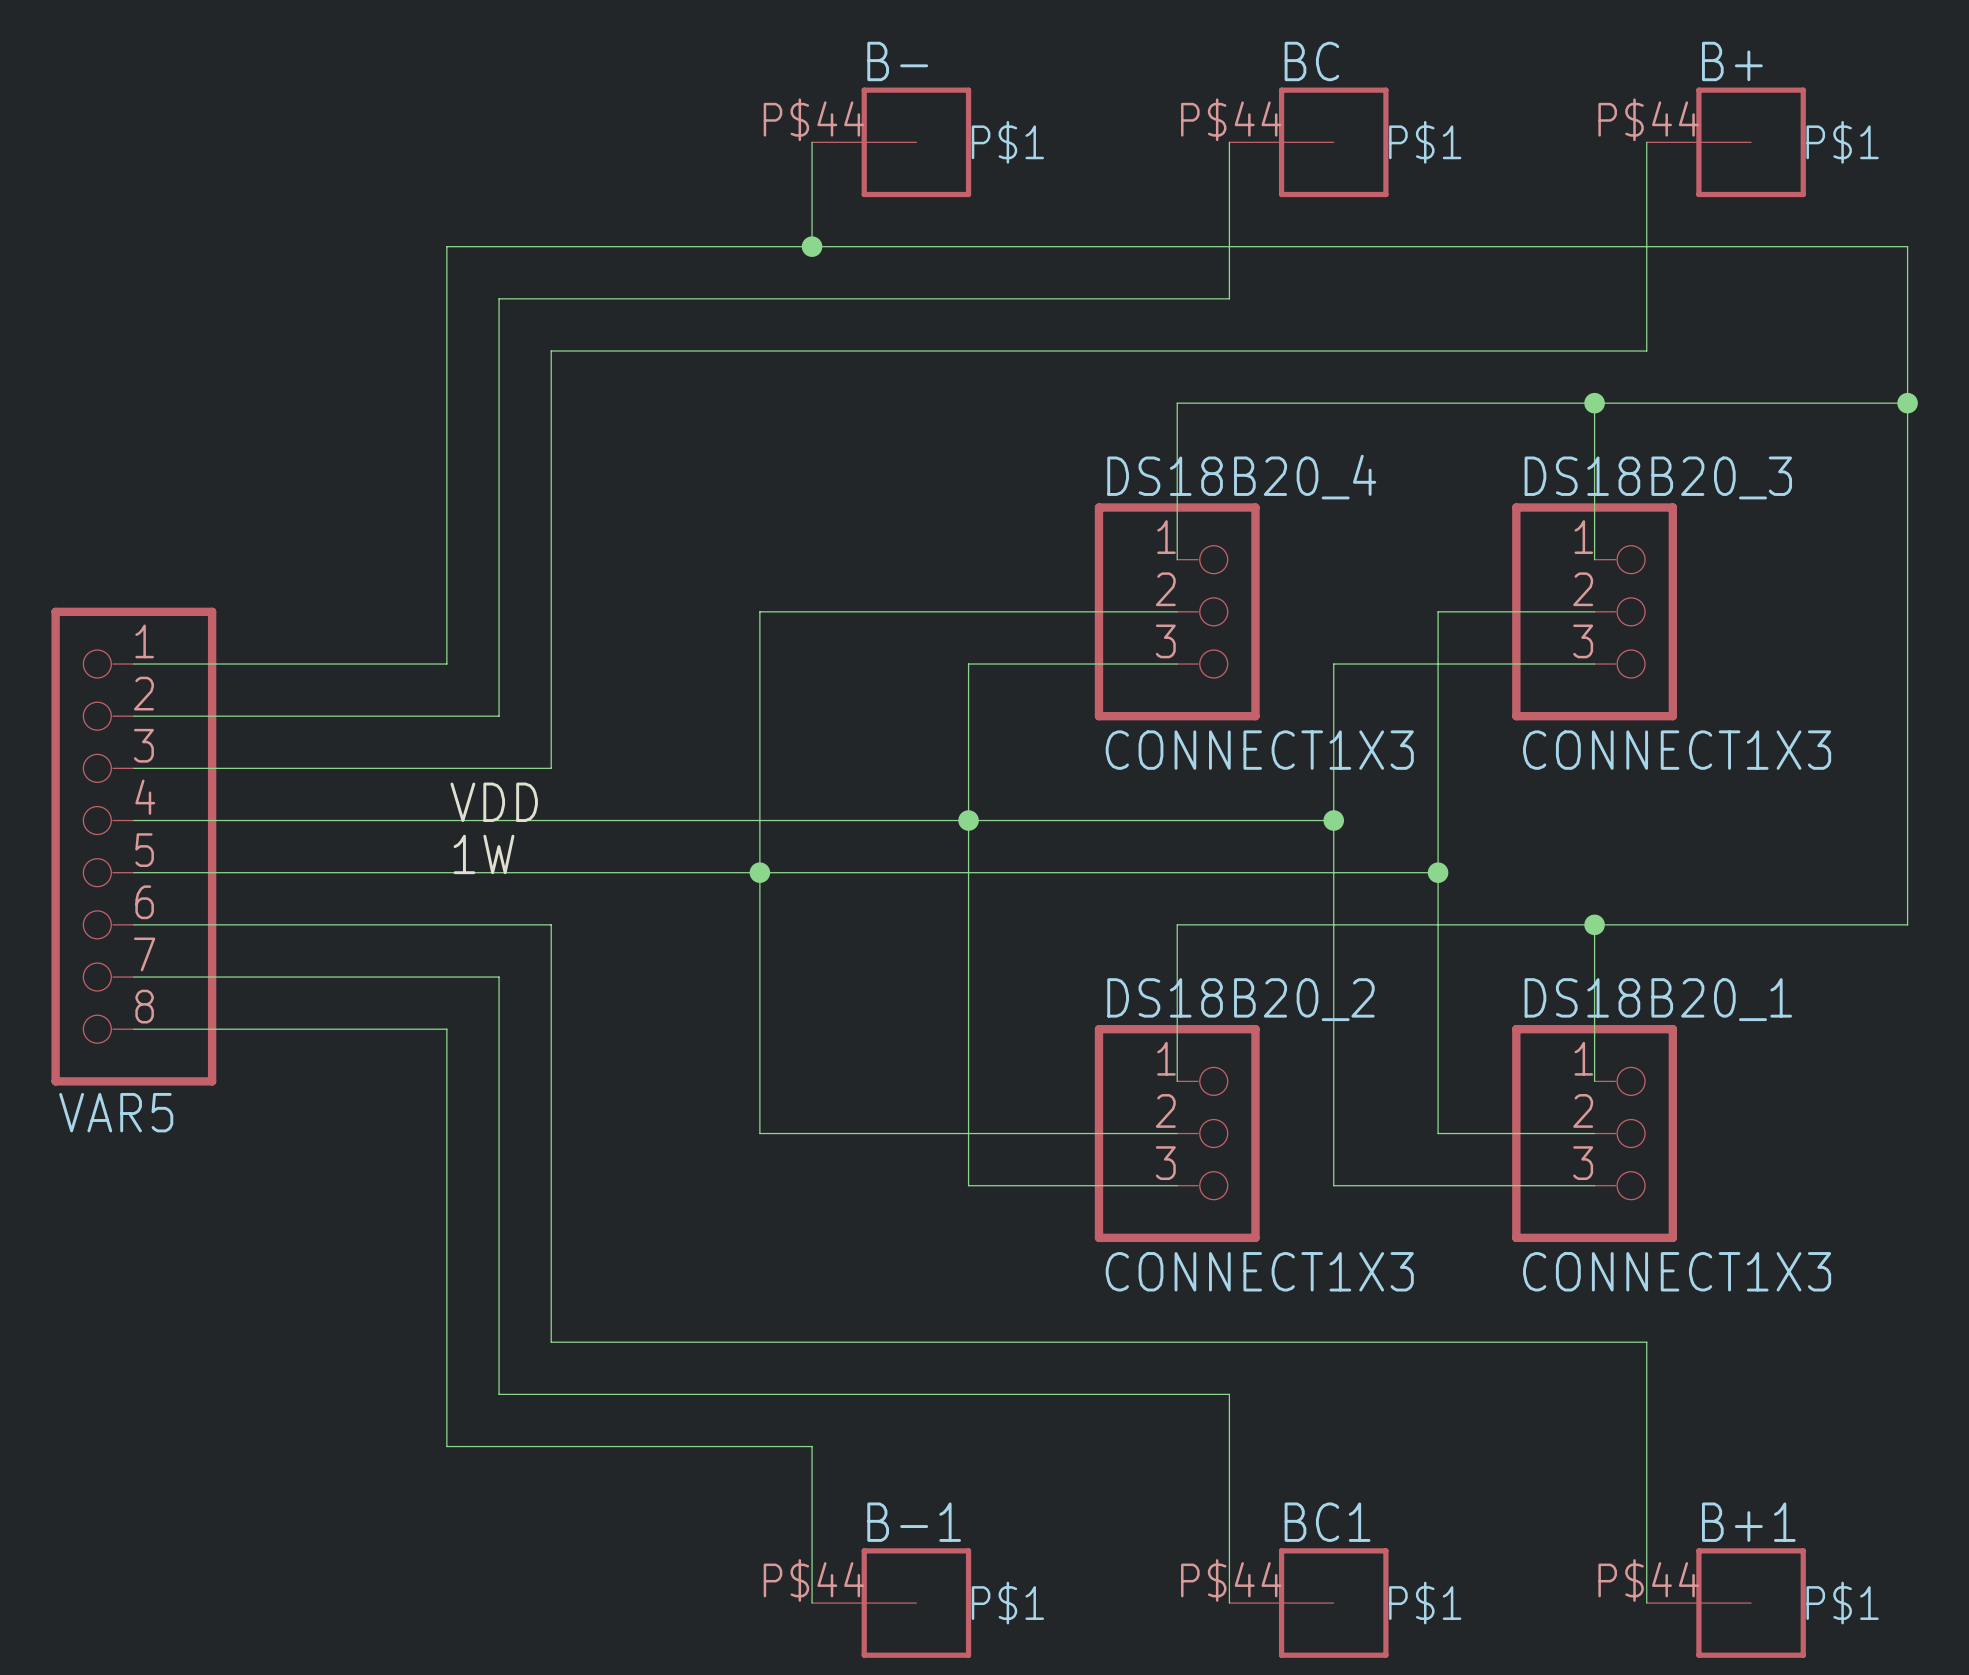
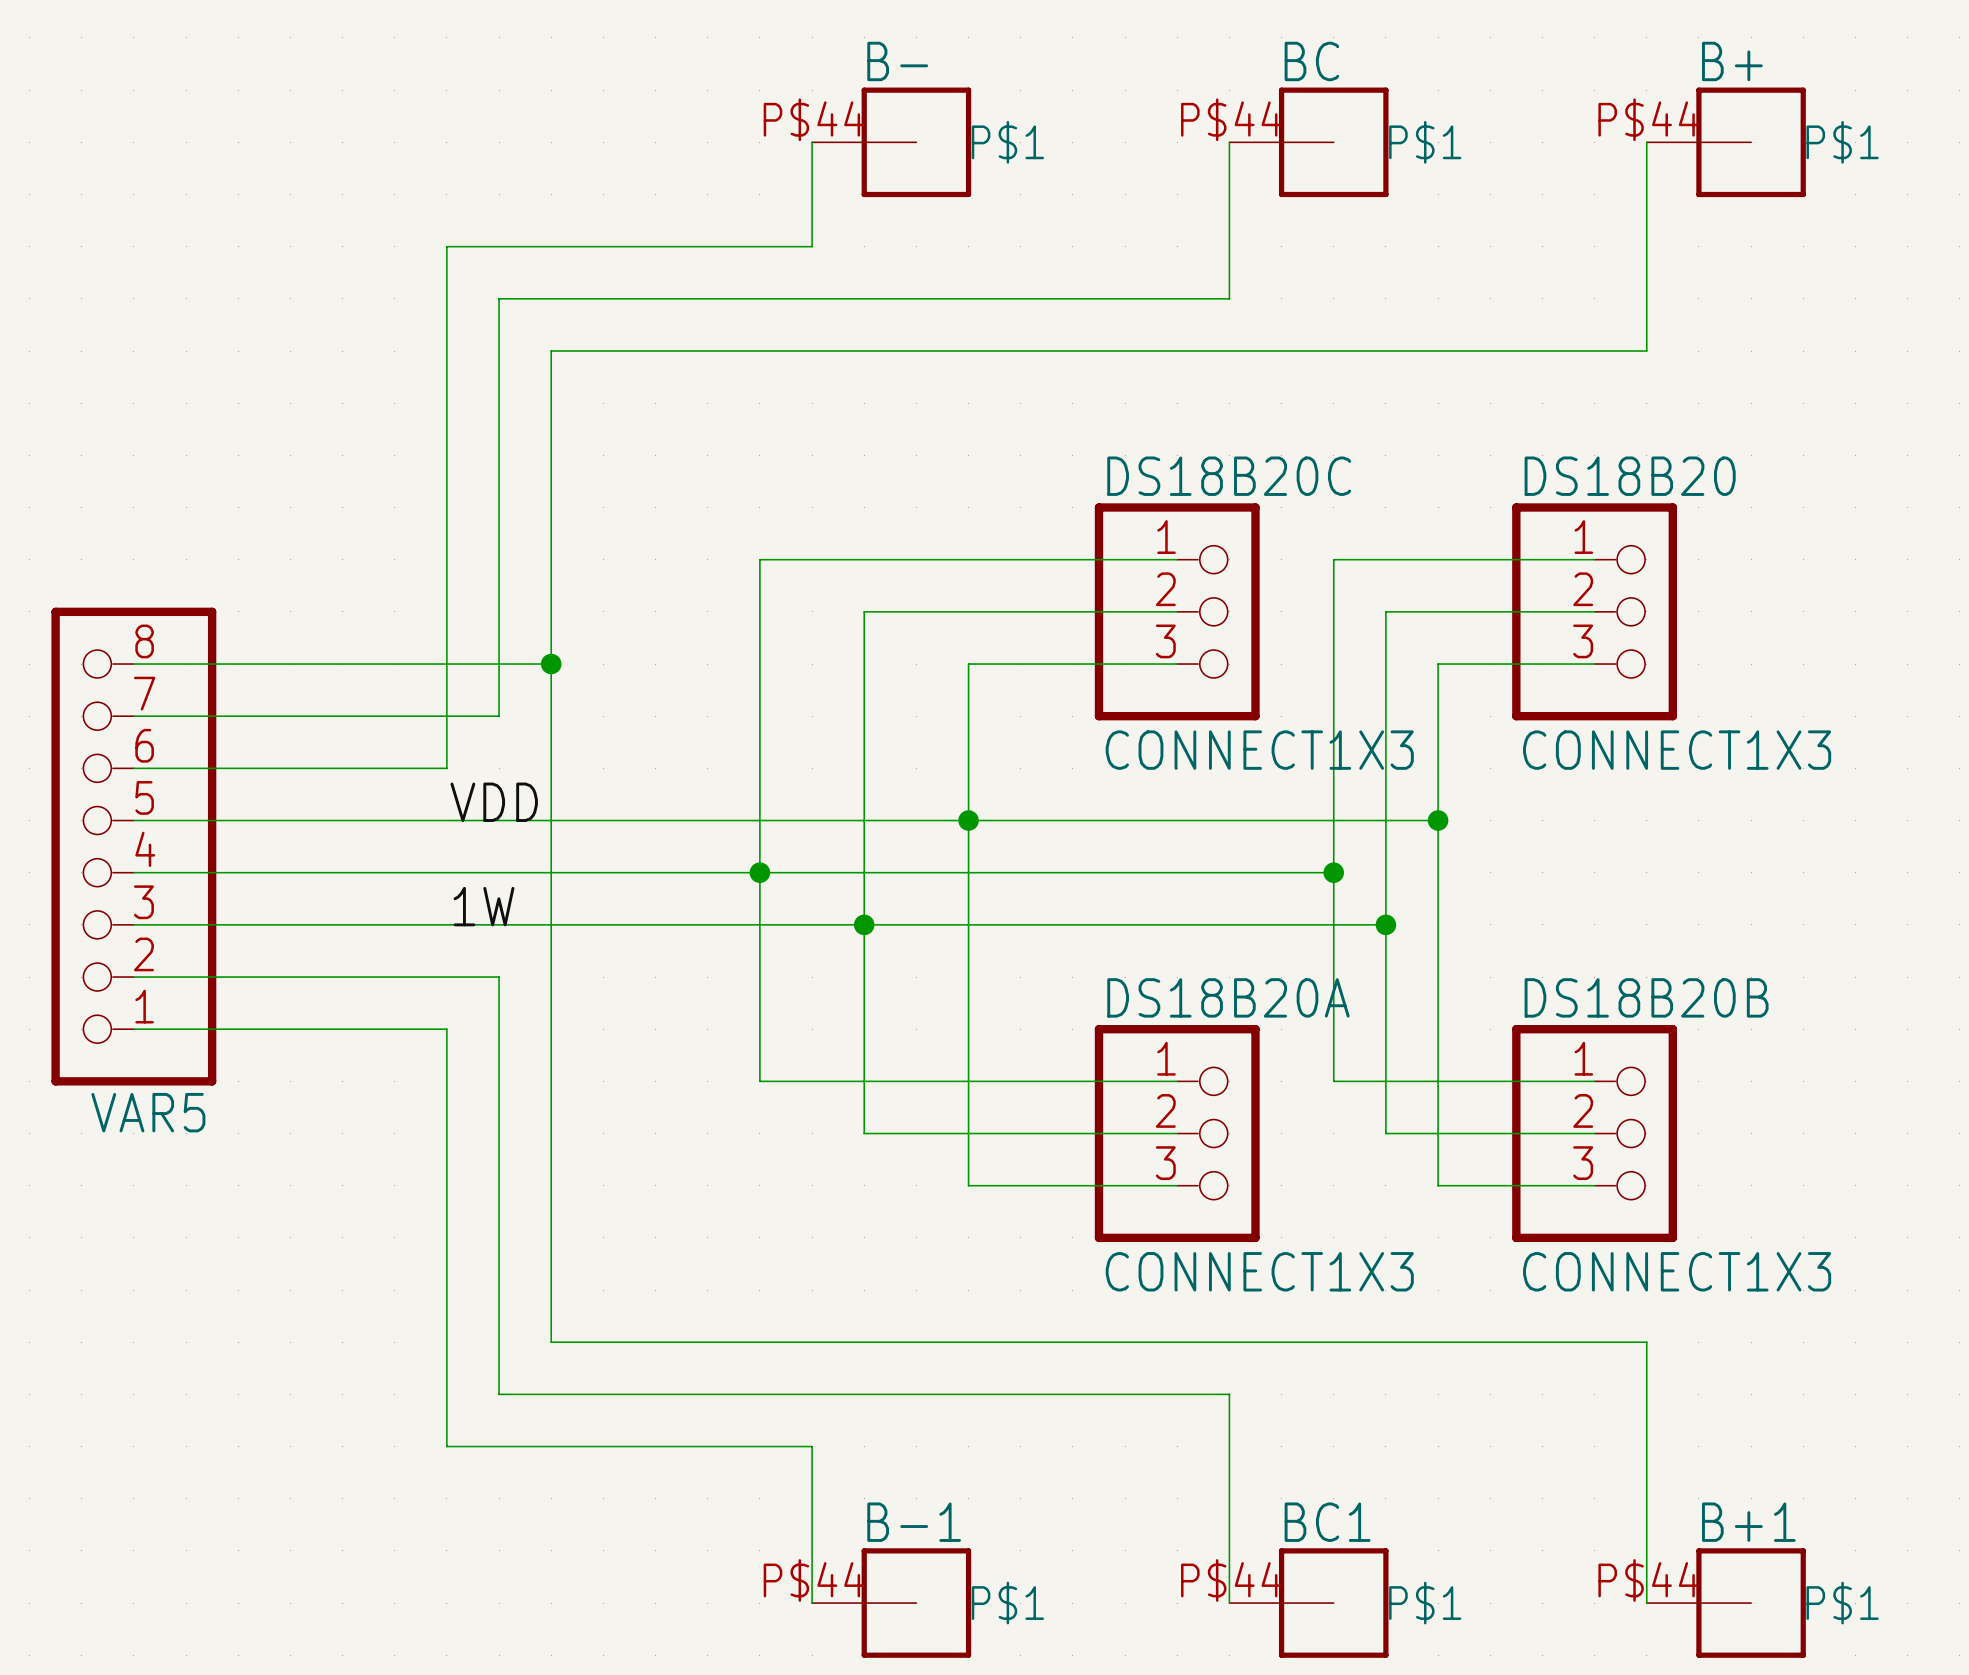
wire: (812, 246) (1907, 246) (1907, 924) (1385, 924) -> none
junction: (812, 246) -> none
wire: (1594, 403) (1594, 559) -> none
junction: (1594, 403) -> none
wire: (1907, 403) (1177, 403) (1177, 559) -> none
junction: (1907, 403) -> none
DS18B20_4 name: DS18B20_4 (1241, 477) -> DS18B20C (1229, 476)
DS18B20_3 name: DS18B20_3 (1658, 477) -> DS18B20 (1630, 476)
wire: (759, 611) (864, 611) -> (759, 611) (759, 559) (1177, 559)
wire: none -> (864, 611) (864, 1133)
wire: (1438, 611) (1438, 664) (1333, 664) -> (1594, 559) (1333, 559) (1333, 664)
wire: none -> (1438, 611) (1385, 611) (1385, 1133) (1438, 1133) (1438, 1185)
junction: none -> (551, 664)
wire: (446, 768) (551, 768) -> (446, 768) (446, 664) (551, 664)
junction: (1333, 820) -> none
junction: none -> (1438, 820)
VAR5 flip: as is (133, 846) -> up-down (133, 846)
label position: 1W (484, 854) -> 1W (484, 906)
wire: (1333, 872) (1438, 872) -> (1333, 820) (1438, 820)
junction: none -> (1333, 872)
junction: (1438, 872) -> none
junction: none -> (864, 924)
wire: (1177, 924) (1177, 1081) -> (1177, 924) (551, 924) (551, 768)
junction: none -> (1385, 924)
wire: (1594, 924) (1594, 1081) -> none
junction: (1594, 924) -> none
DS18B20_2 name: DS18B20_2 (1240, 999) -> DS18B20A (1228, 997)
DS18B20_1 name: DS18B20_1 (1658, 999) -> DS18B20B (1646, 997)
wire: (759, 1081) (759, 1133) (864, 1133) -> (759, 1081) (1177, 1081)
wire: (1333, 1081) (1333, 1185) (1438, 1185) -> (1333, 1081) (1594, 1081)

